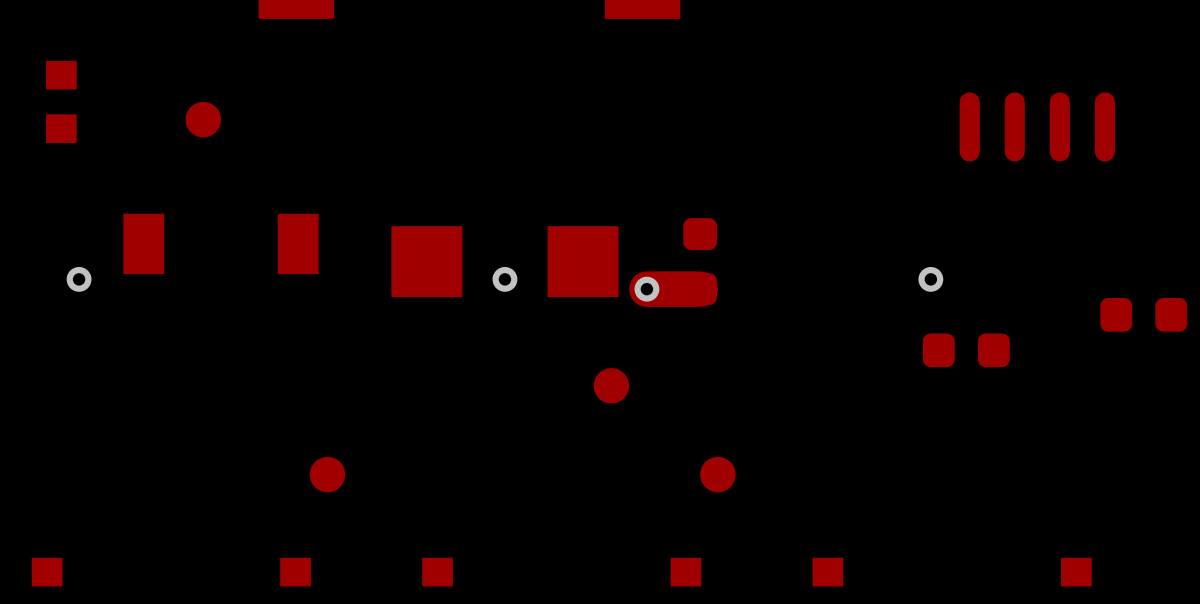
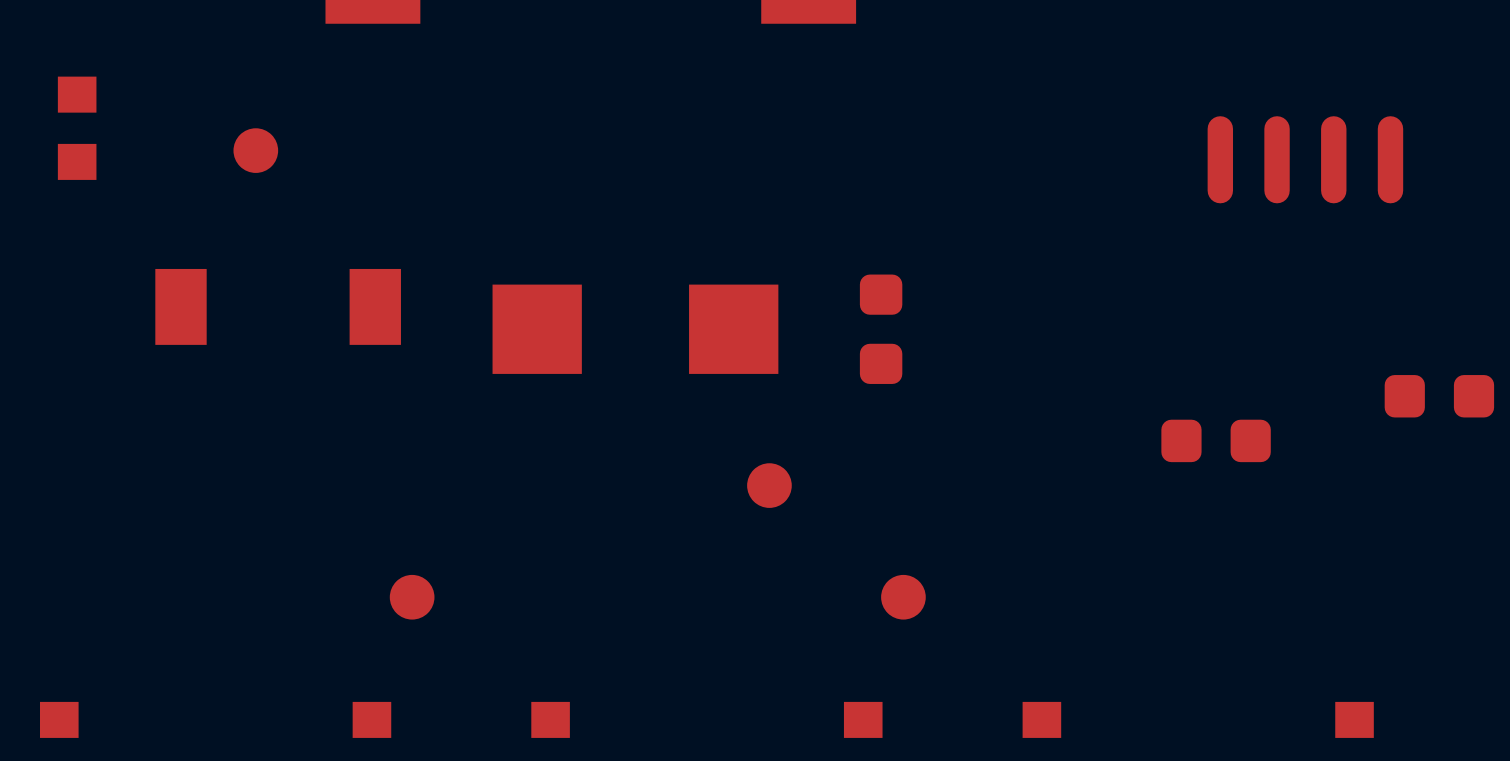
via: (79, 279) -> none
via: (504, 279) -> none
via: (930, 279) -> none
via: (646, 289) -> none
top track: (700, 289) (646, 289) -> none

